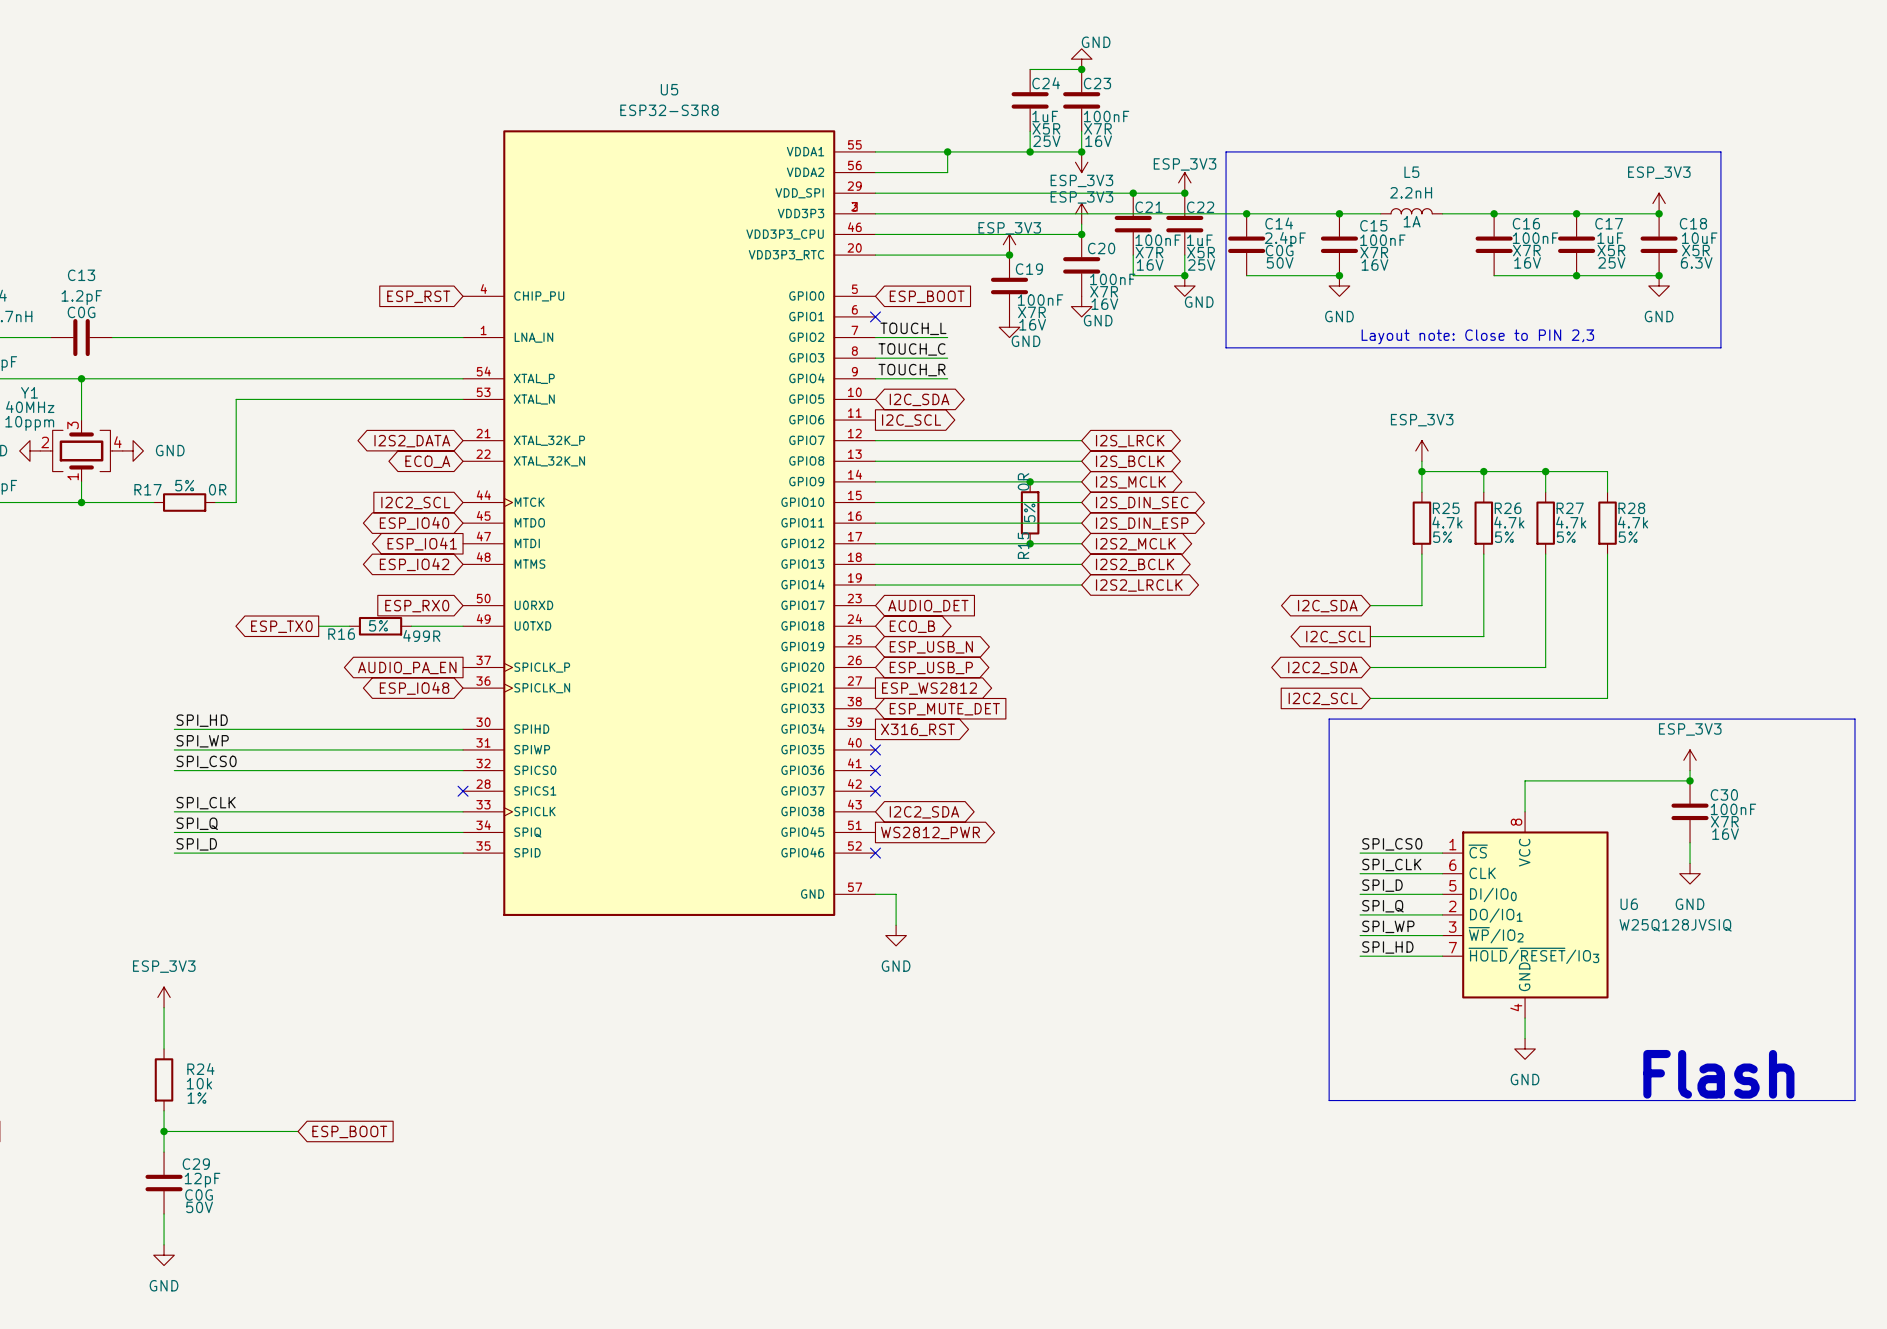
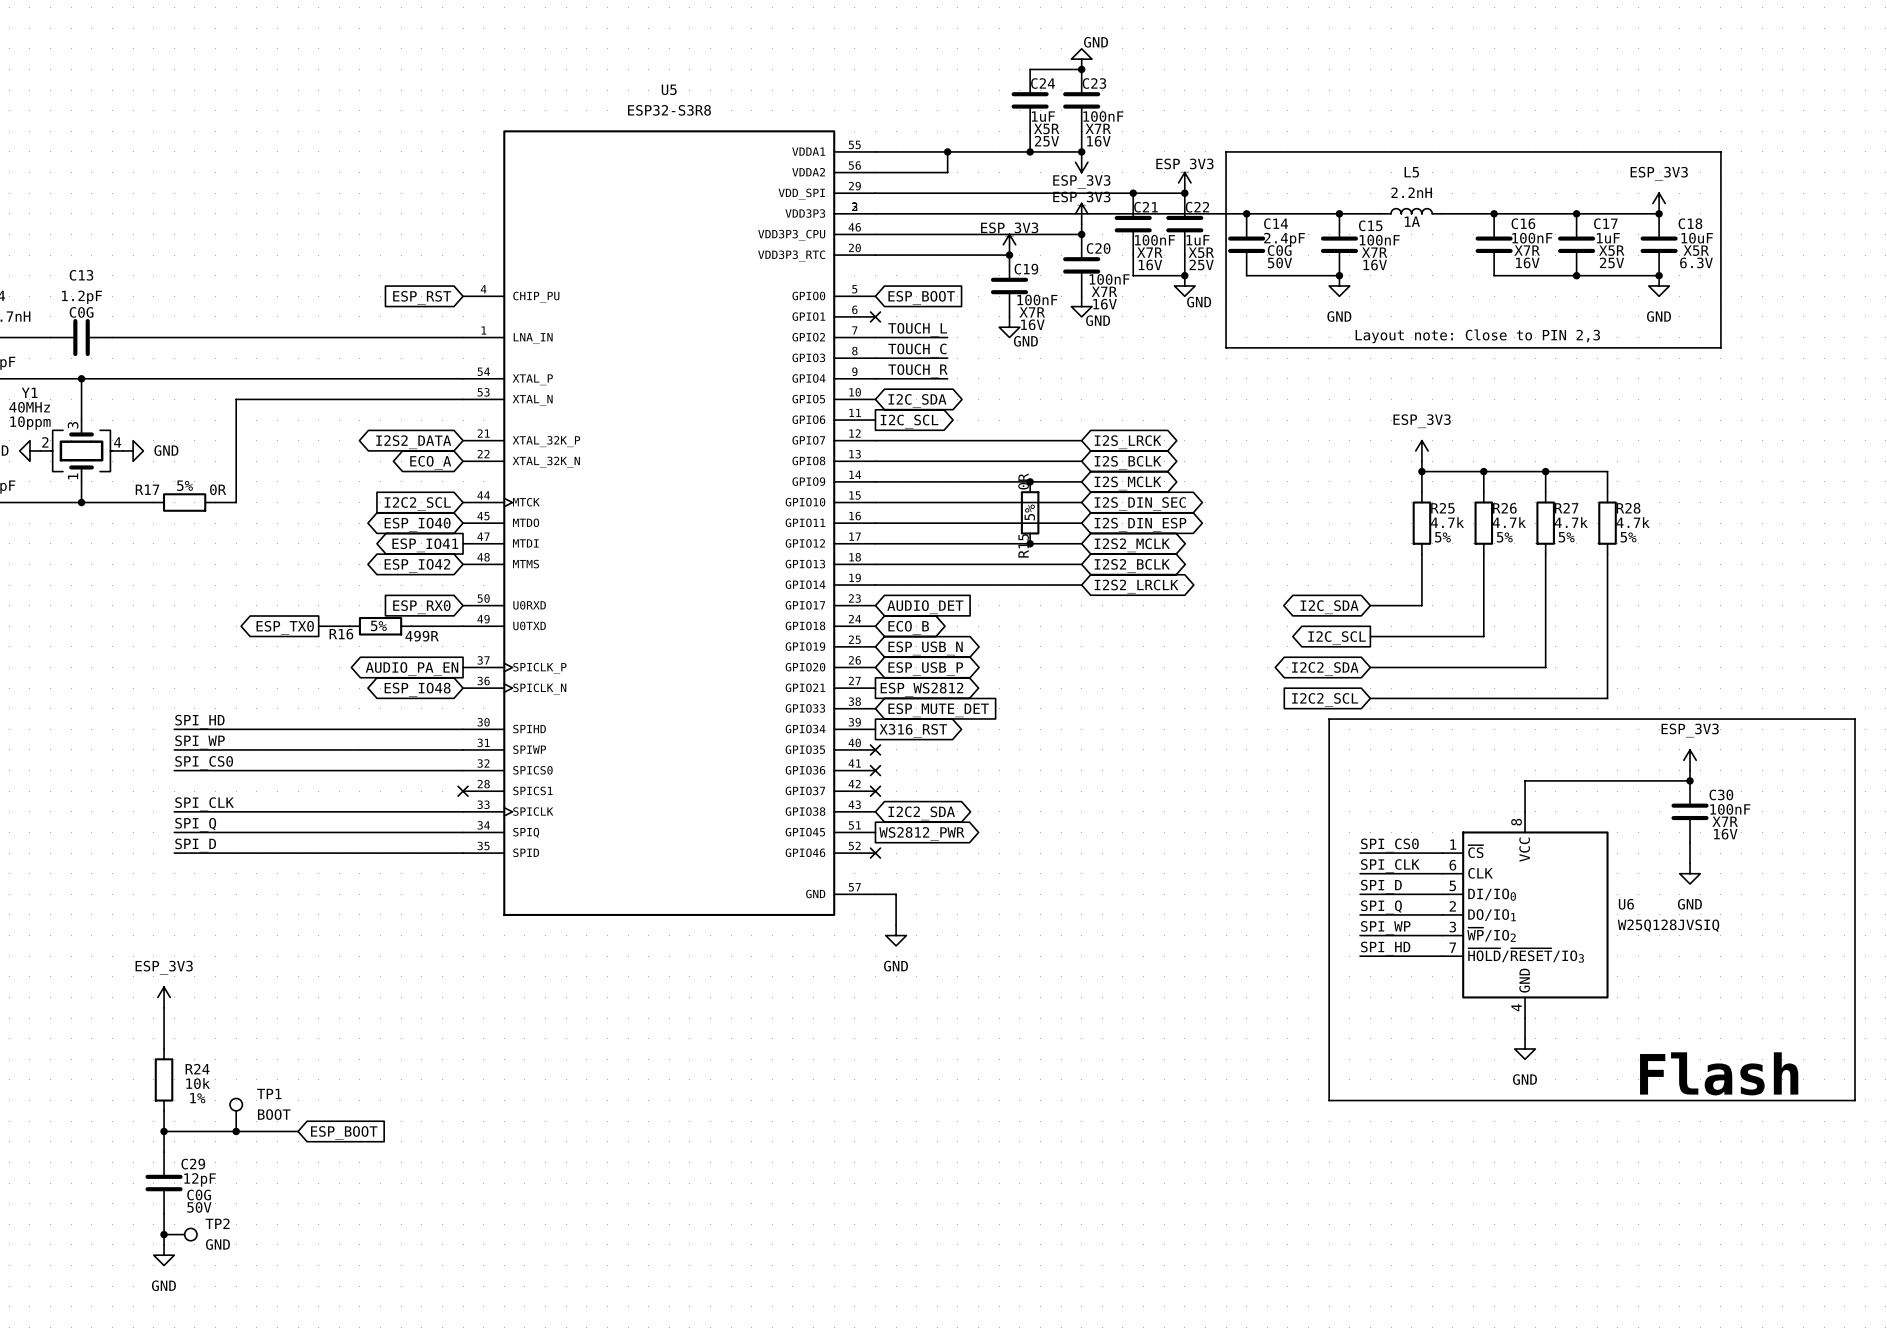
TP1: none -> BOOT (236, 1114)
junction: none -> (236, 1131)
junction: none -> (164, 1234)
TP2: none -> GND (180, 1234)

